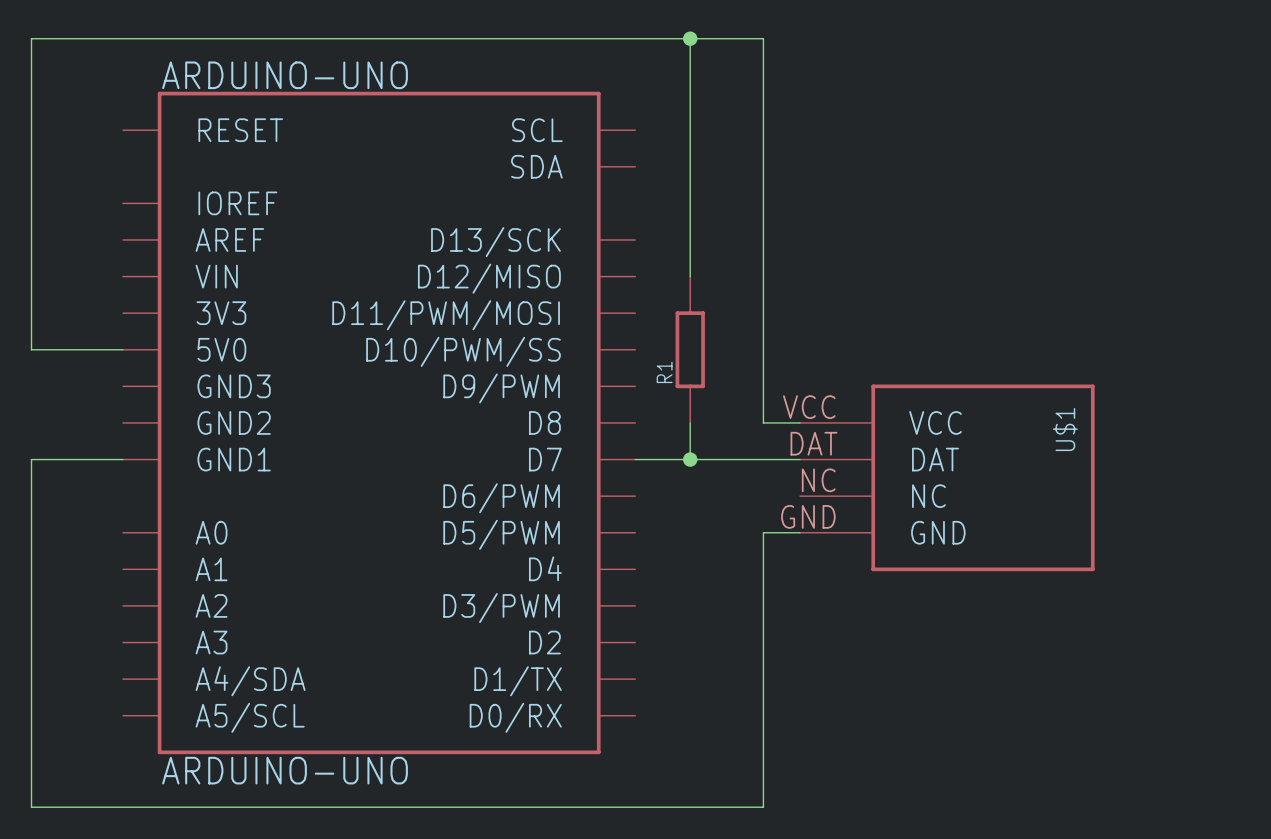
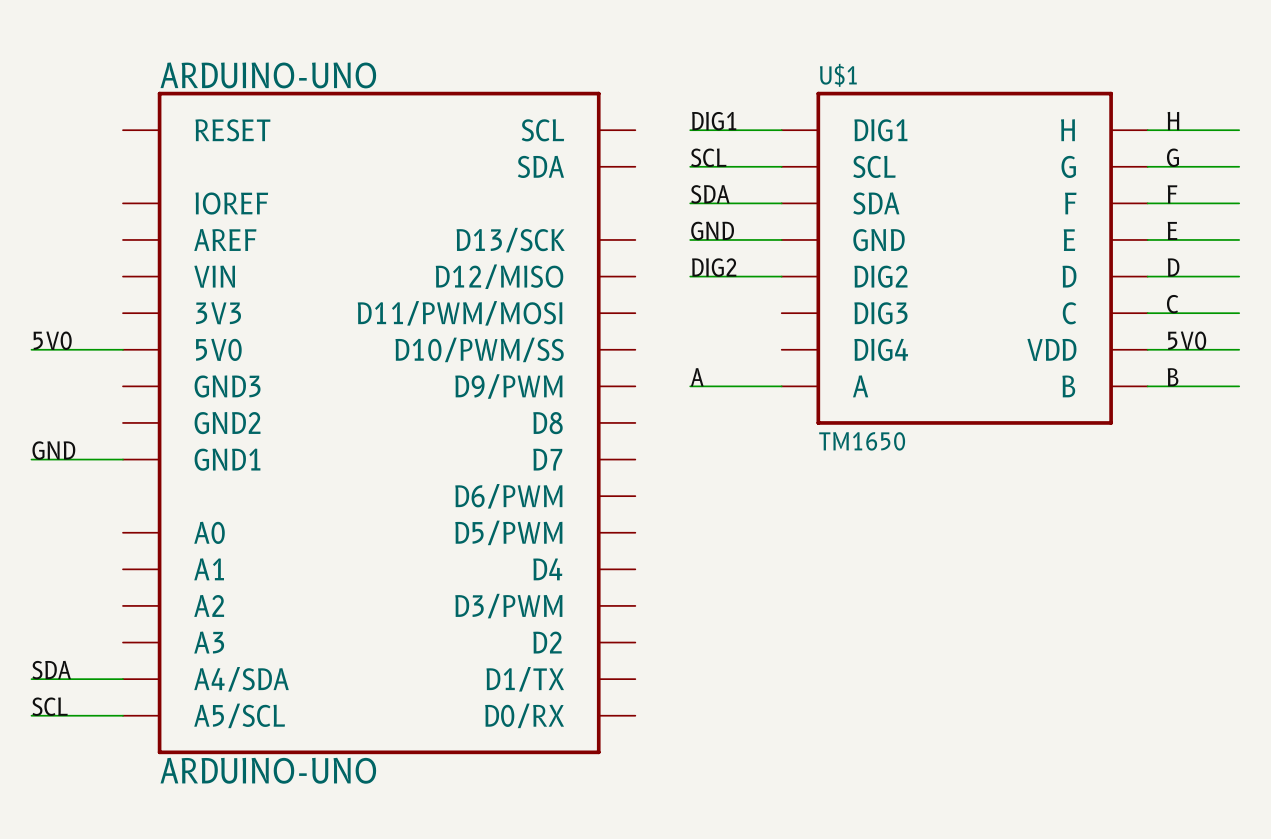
wire: (690, 38) (690, 276) -> (781, 276) (690, 276)
junction: (690, 38) -> none
label: none -> DIG1 (714, 121)
label: none -> H (1173, 121)
wire: none -> (690, 130) (781, 130)
wire: none -> (1147, 130) (1239, 130)
label: none -> SCL (708, 157)
label: none -> G (1172, 157)
wire: none -> (690, 166) (781, 166)
wire: none -> (1147, 166) (1239, 166)
label: none -> SDA (710, 194)
label: none -> F (1172, 194)
wire: none -> (690, 203) (781, 203)
wire: none -> (1147, 203) (1239, 203)
label: none -> GND (712, 230)
label: none -> E (1172, 230)
wire: none -> (690, 239) (781, 239)
wire: none -> (1147, 239) (1239, 239)
label: none -> DIG2 (714, 267)
label: none -> D (1173, 267)
wire: none -> (1147, 276) (1239, 276)
label: none -> C (1172, 304)
wire: none -> (1147, 313) (1239, 313)
label: none -> 5V0 (52, 340)
label: none -> 5V0 (1187, 340)
wire: (31, 349) (31, 38) (763, 38) (763, 422) (800, 422) -> none
R1: (690, 349) -> none
wire: none -> (1147, 349) (1239, 349)
label: none -> A (697, 377)
label: none -> B (1173, 377)
U$1 symbol: [800, 384, 1095, 572] -> [781, 91, 1148, 425]
wire: none -> (690, 386) (781, 386)
wire: none -> (1147, 386) (1239, 386)
wire: (690, 422) (690, 459) -> none
U$1 name position: U$1 (1065, 429) -> U$1 (838, 75)
U$1 value: none -> TM1650 (862, 441)
label: none -> GND (53, 450)
wire: (31, 459) (31, 807) (763, 807) (763, 532) (800, 532) -> none
wire: (635, 459) (800, 459) -> none
junction: (690, 459) -> none
label: none -> SDA (51, 670)
wire: none -> (31, 679) (122, 679)
label: none -> SCL (50, 706)
wire: none -> (31, 715) (122, 715)

